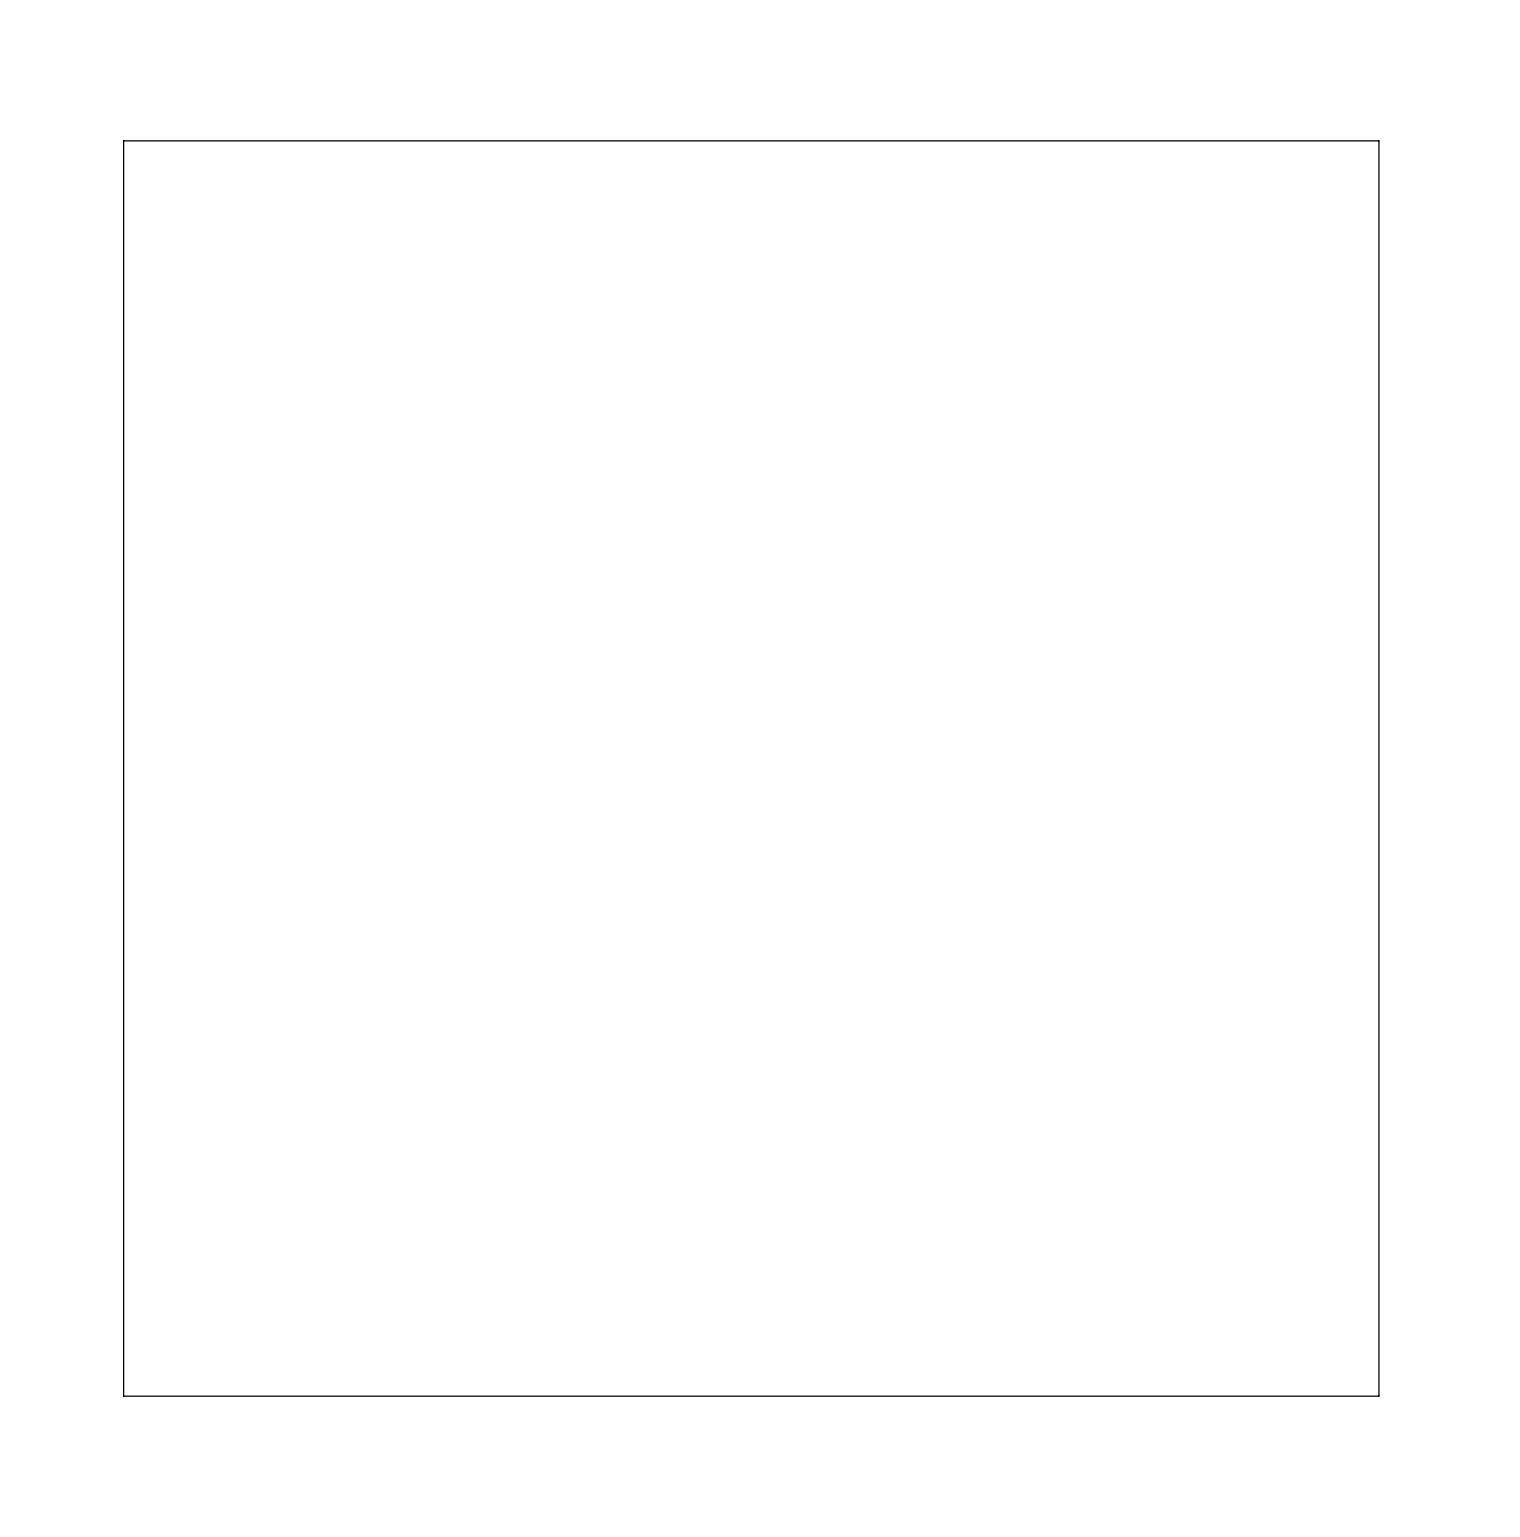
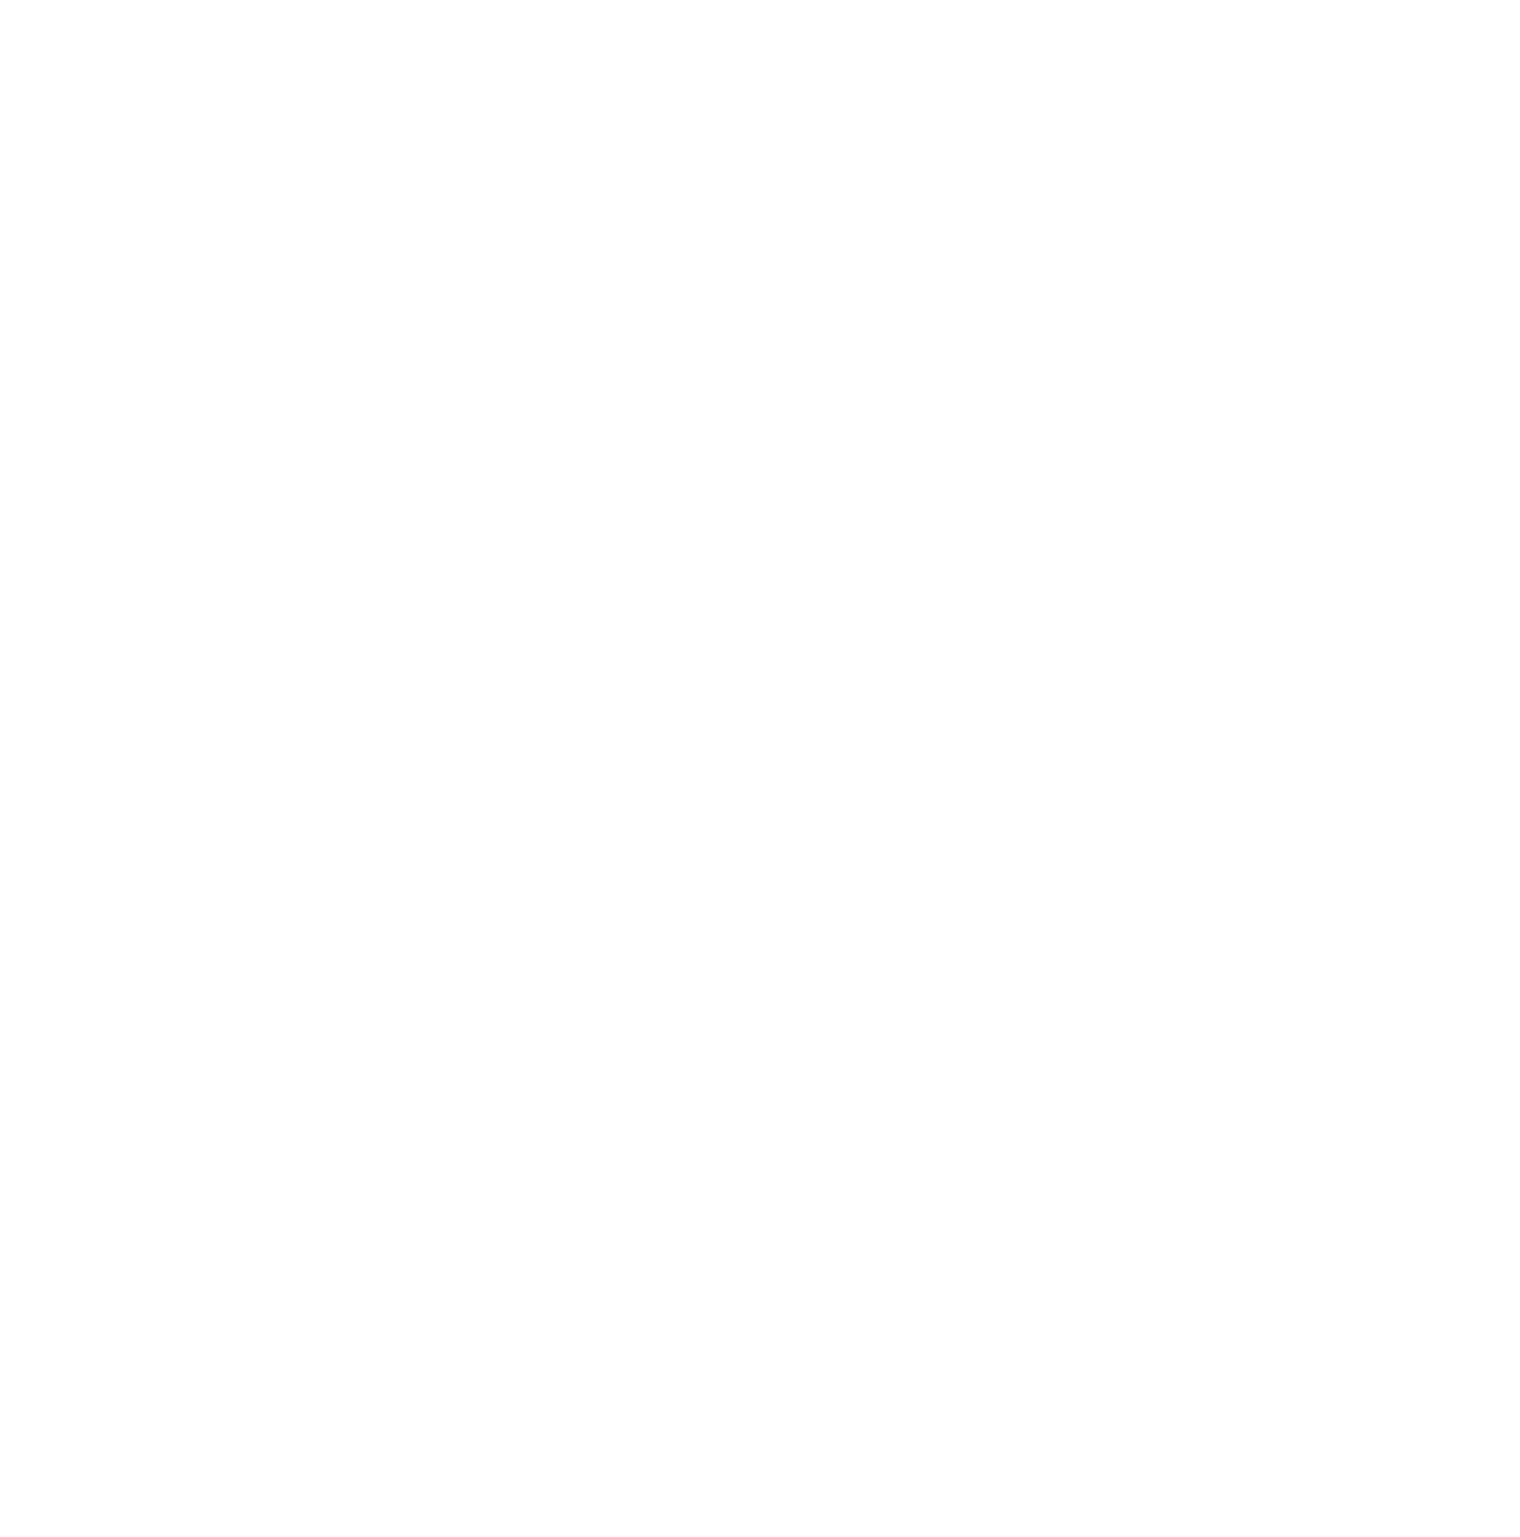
board edge: (1378, 140) (123, 140) (123, 1396) (1378, 1396) (1378, 140) -> none

